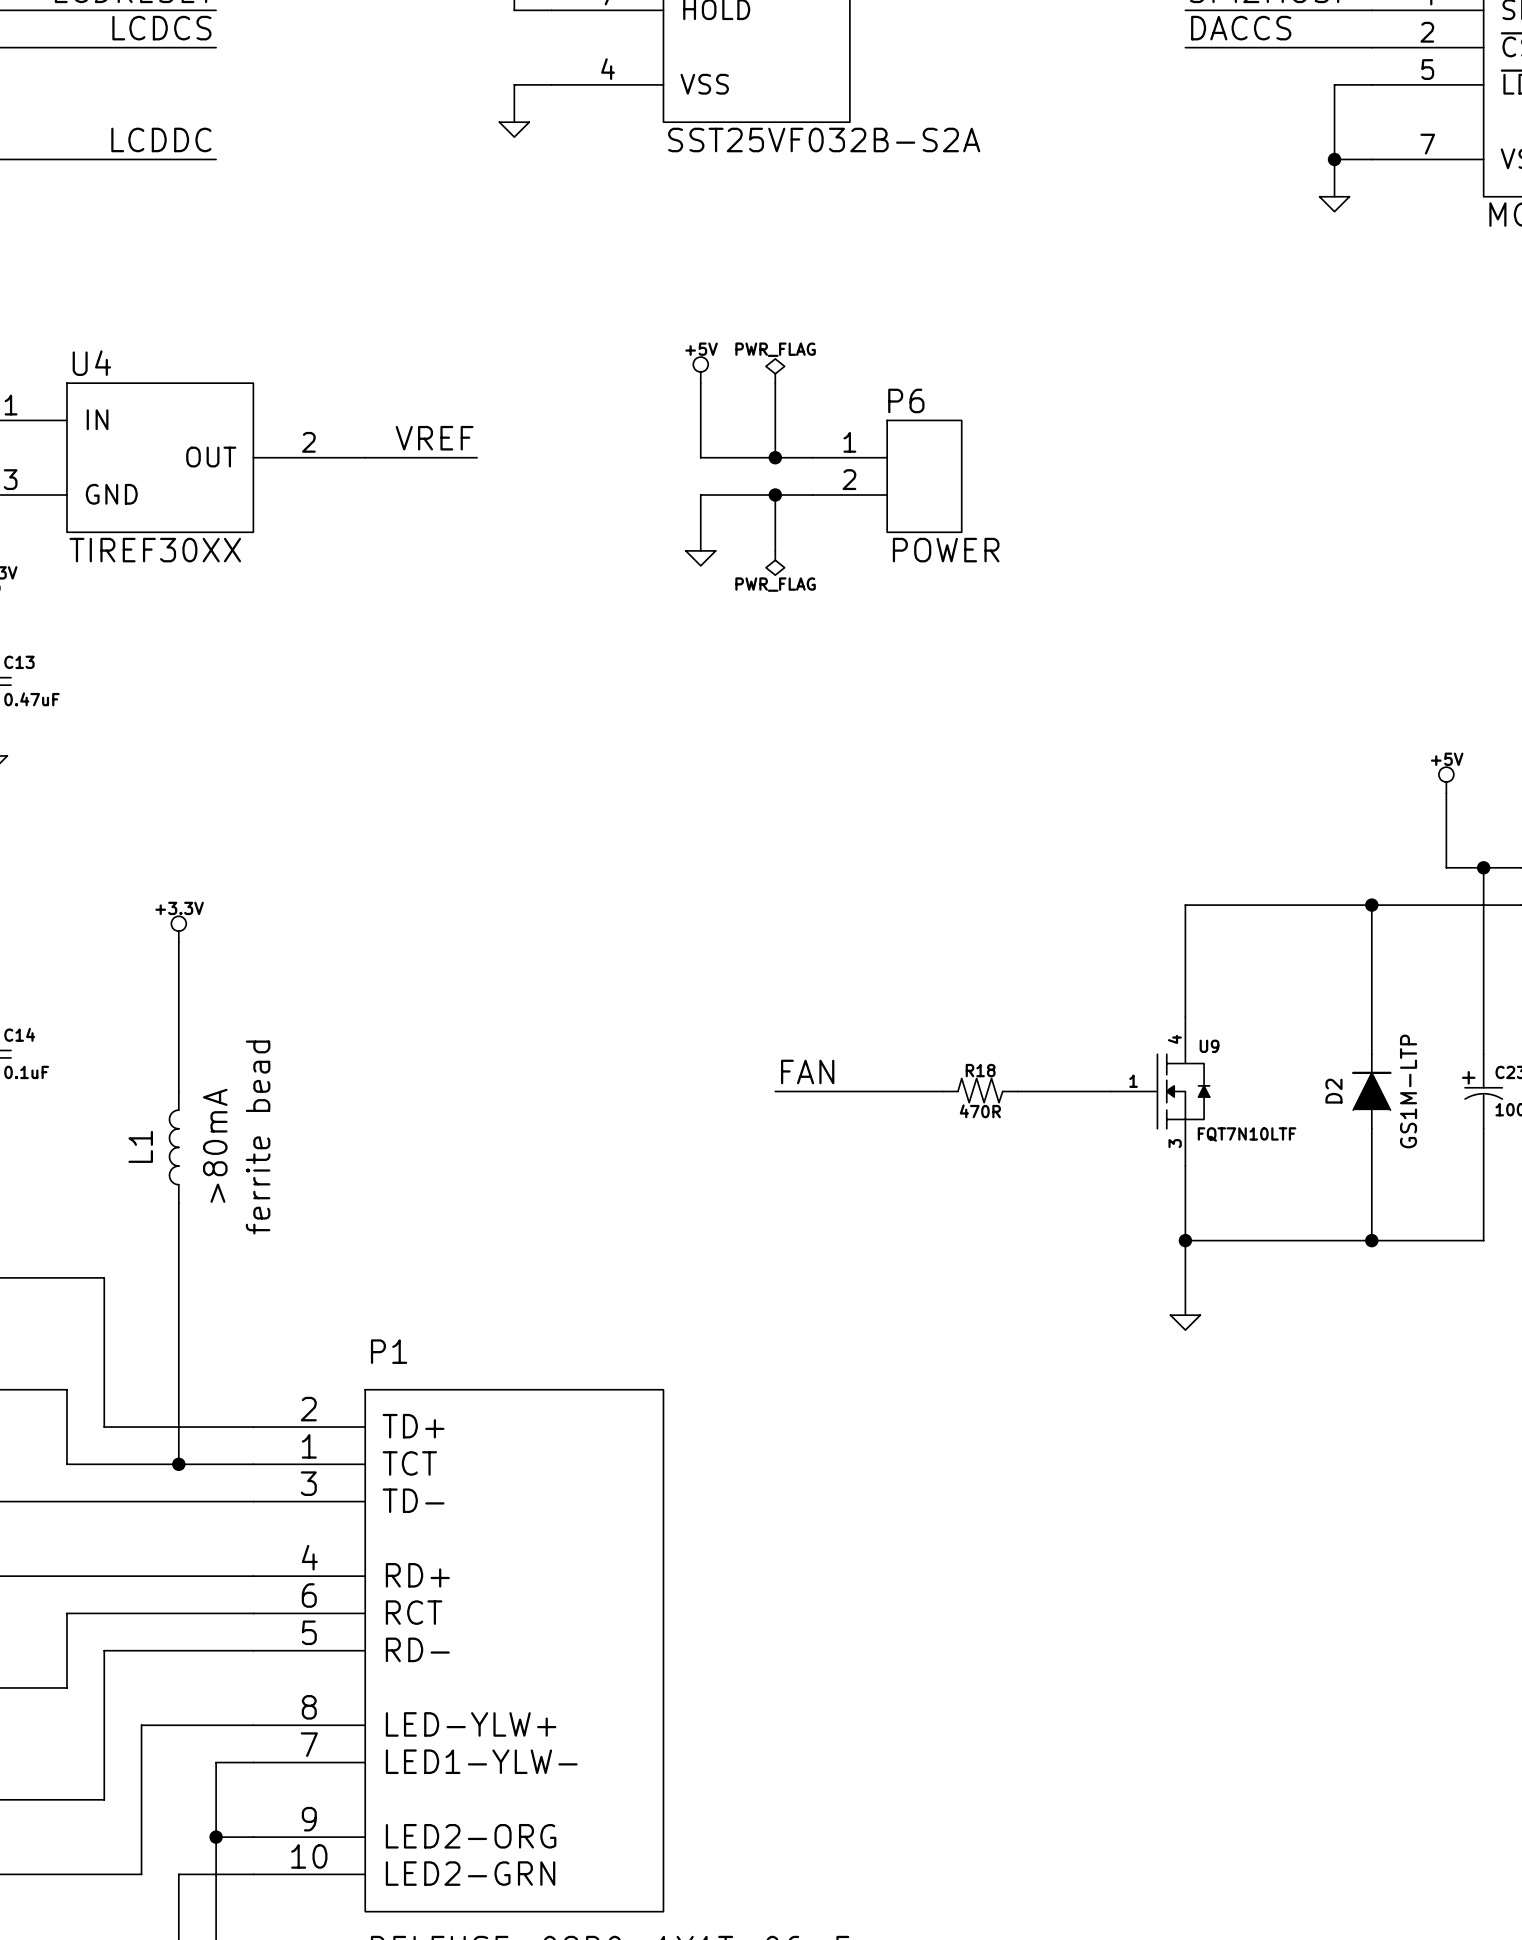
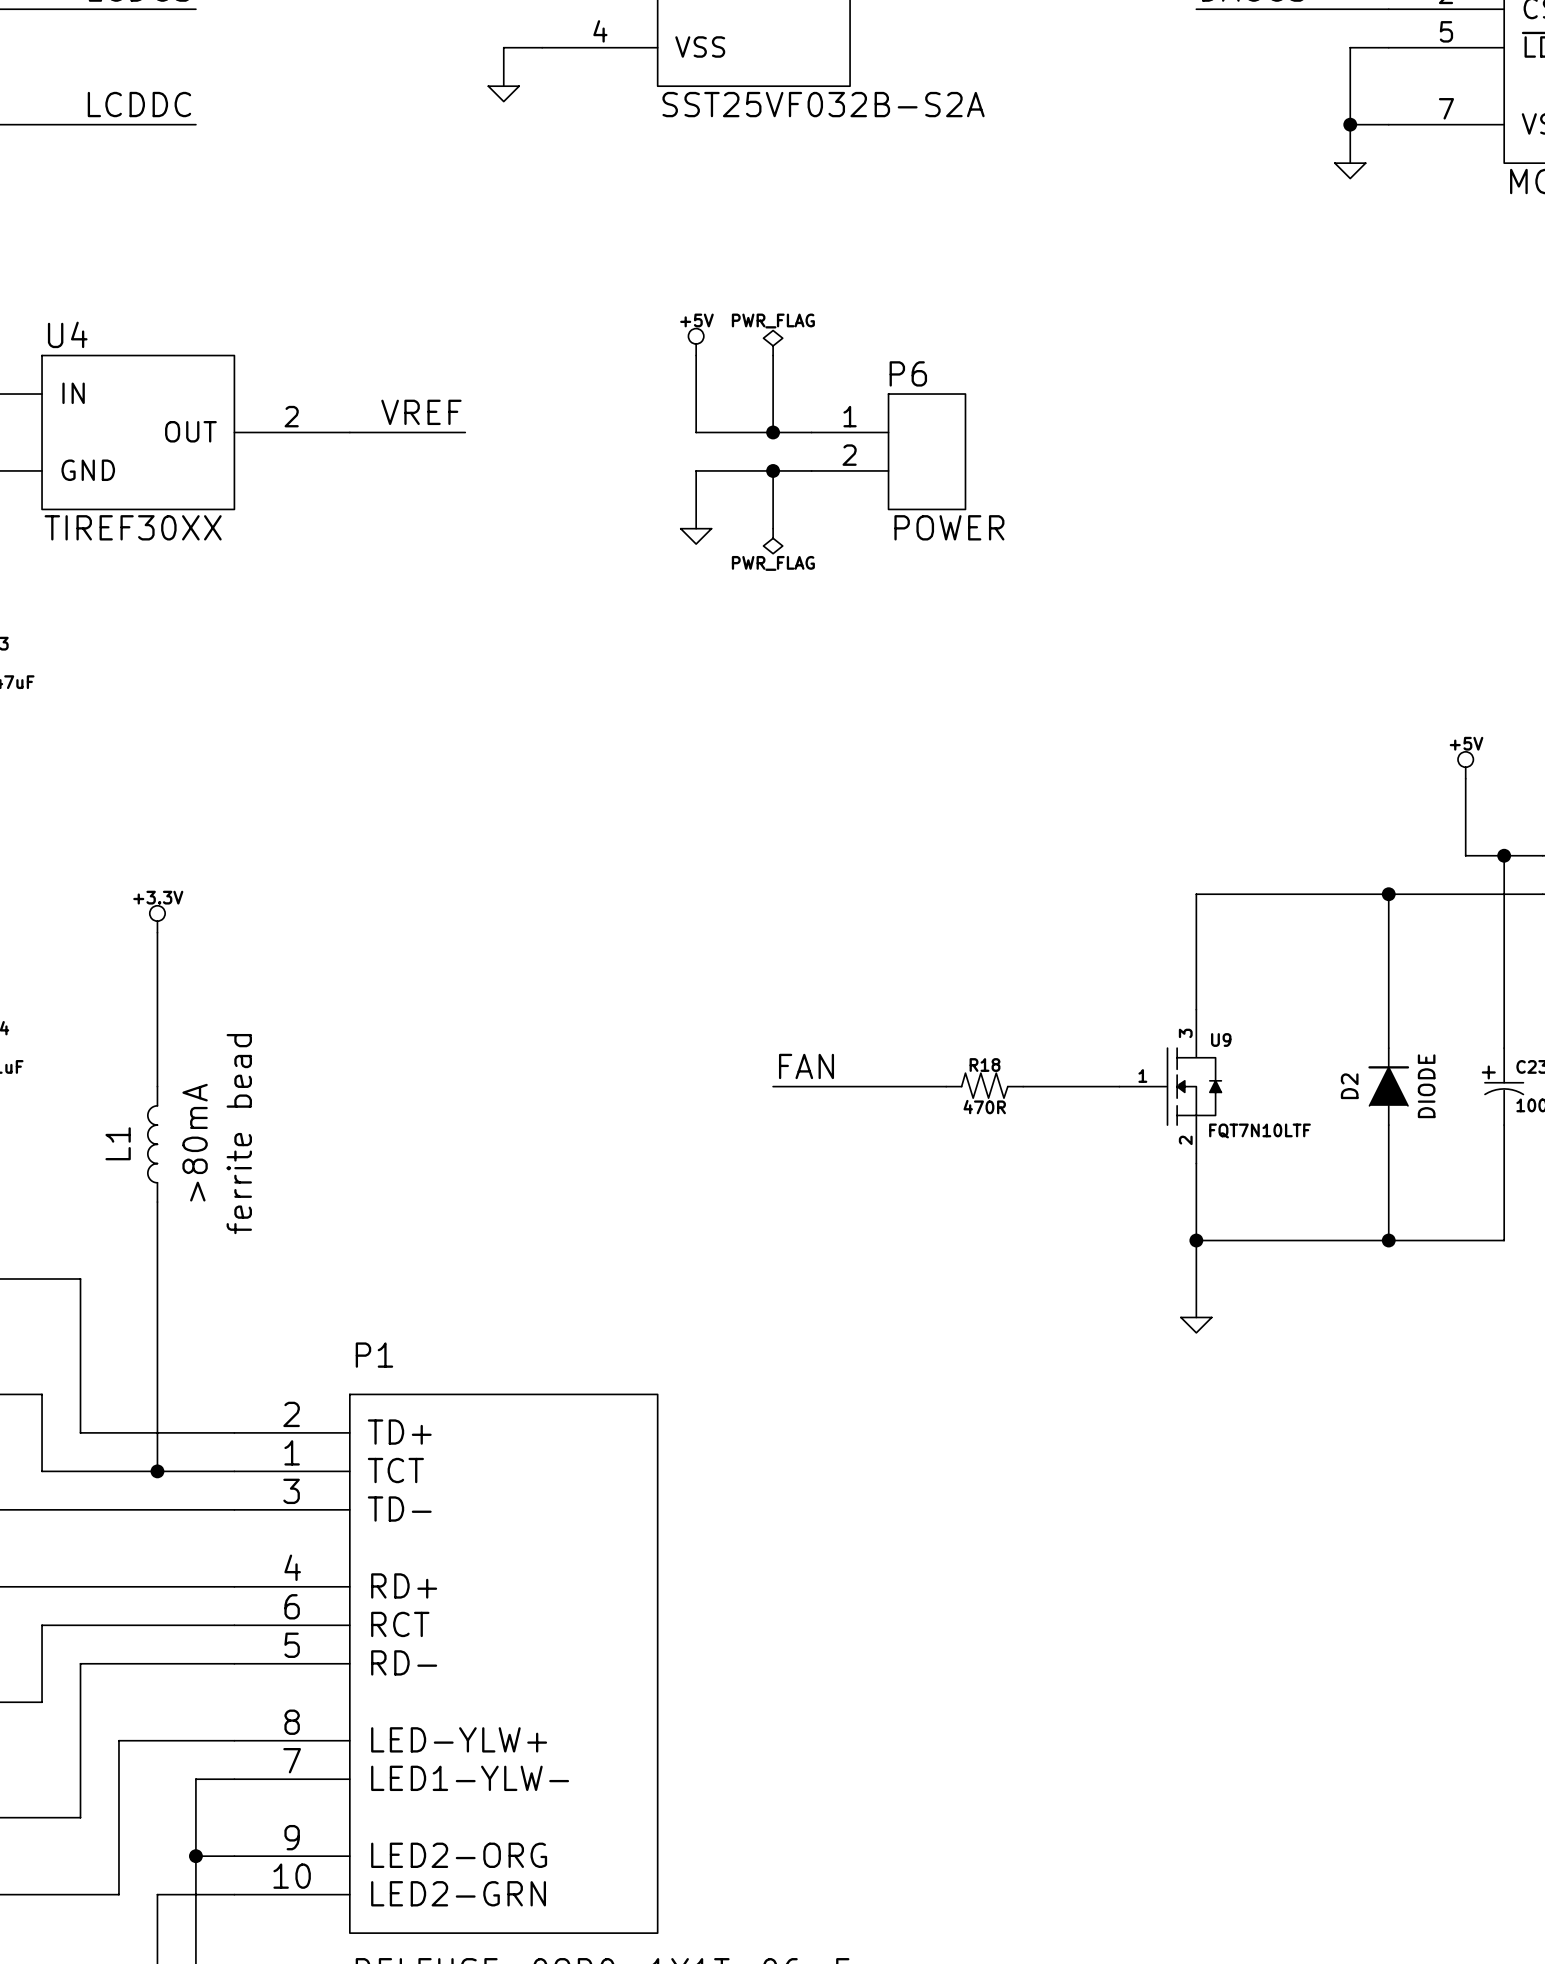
U9 pin number: 4 (1174, 1039) -> 3 (1185, 1033)
D2 value: GS1M-LTP (1408, 1091) -> DIODE (1426, 1086)
U9 pin number: 3 (1175, 1143) -> 2 (1185, 1140)

